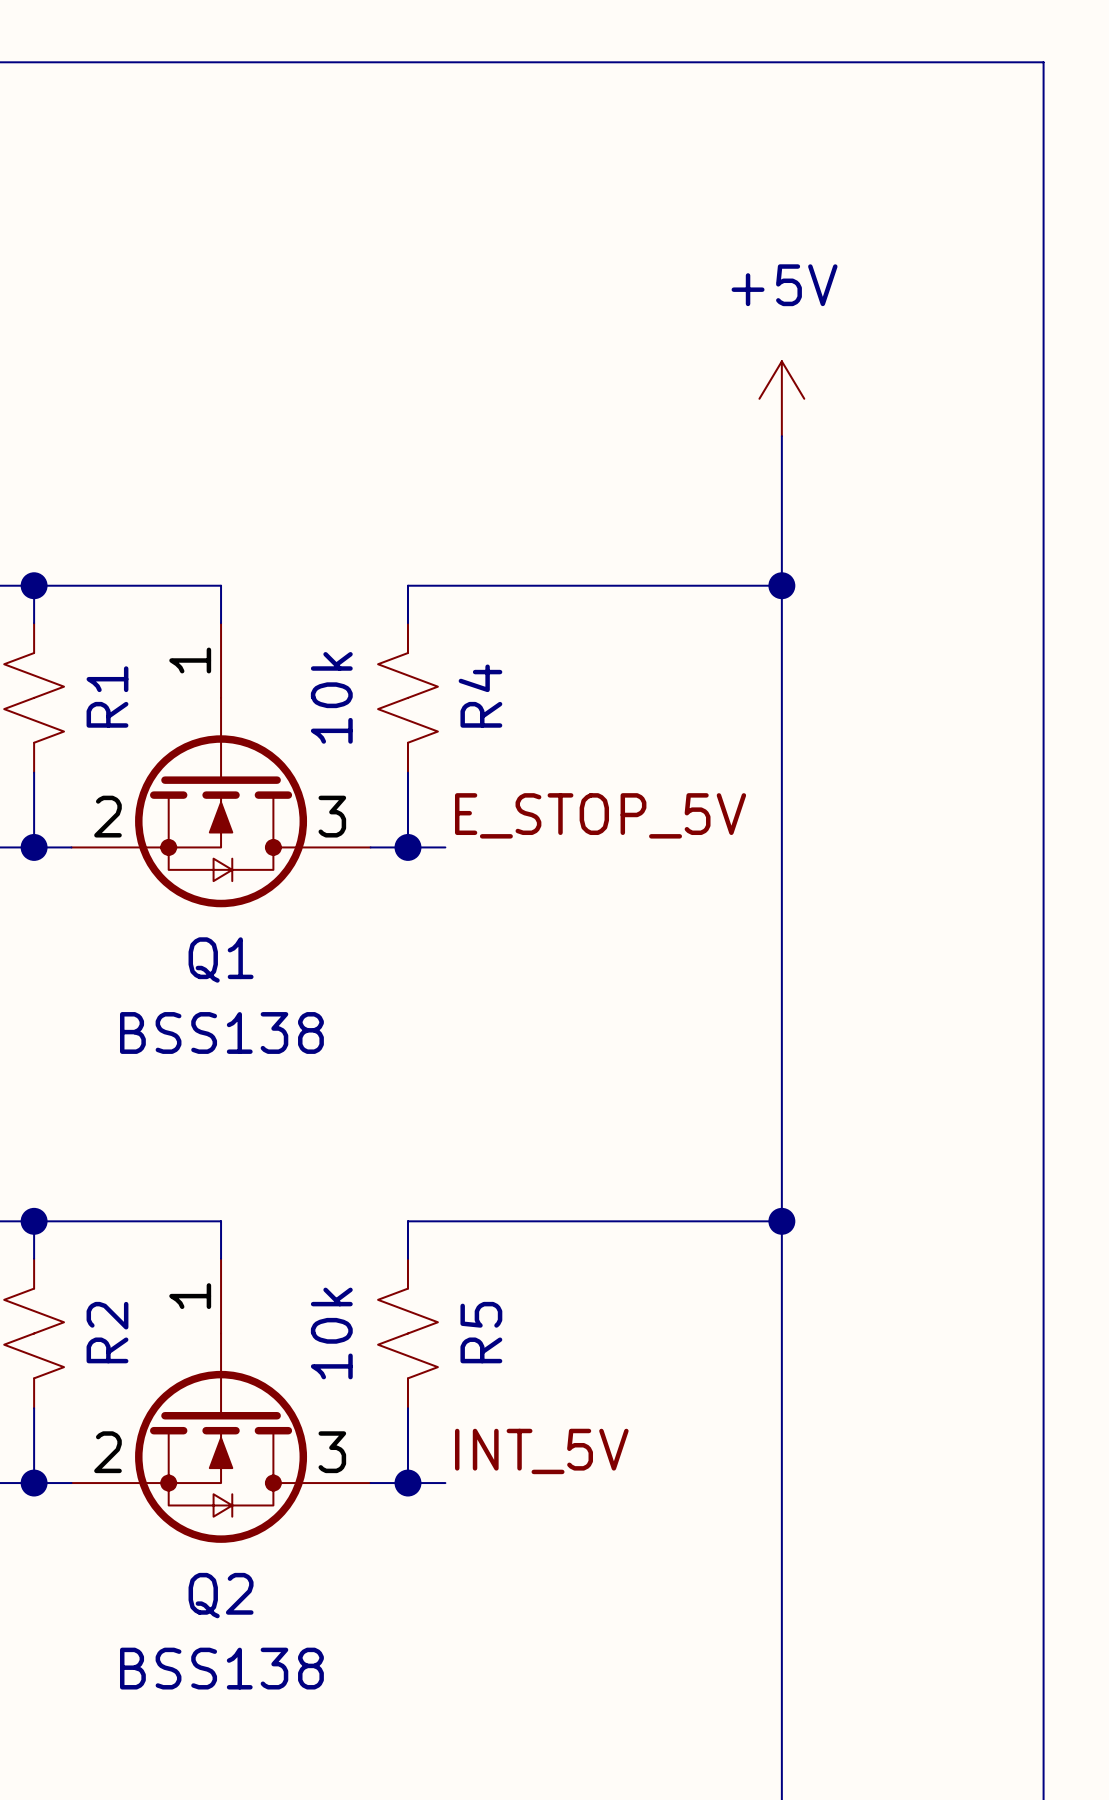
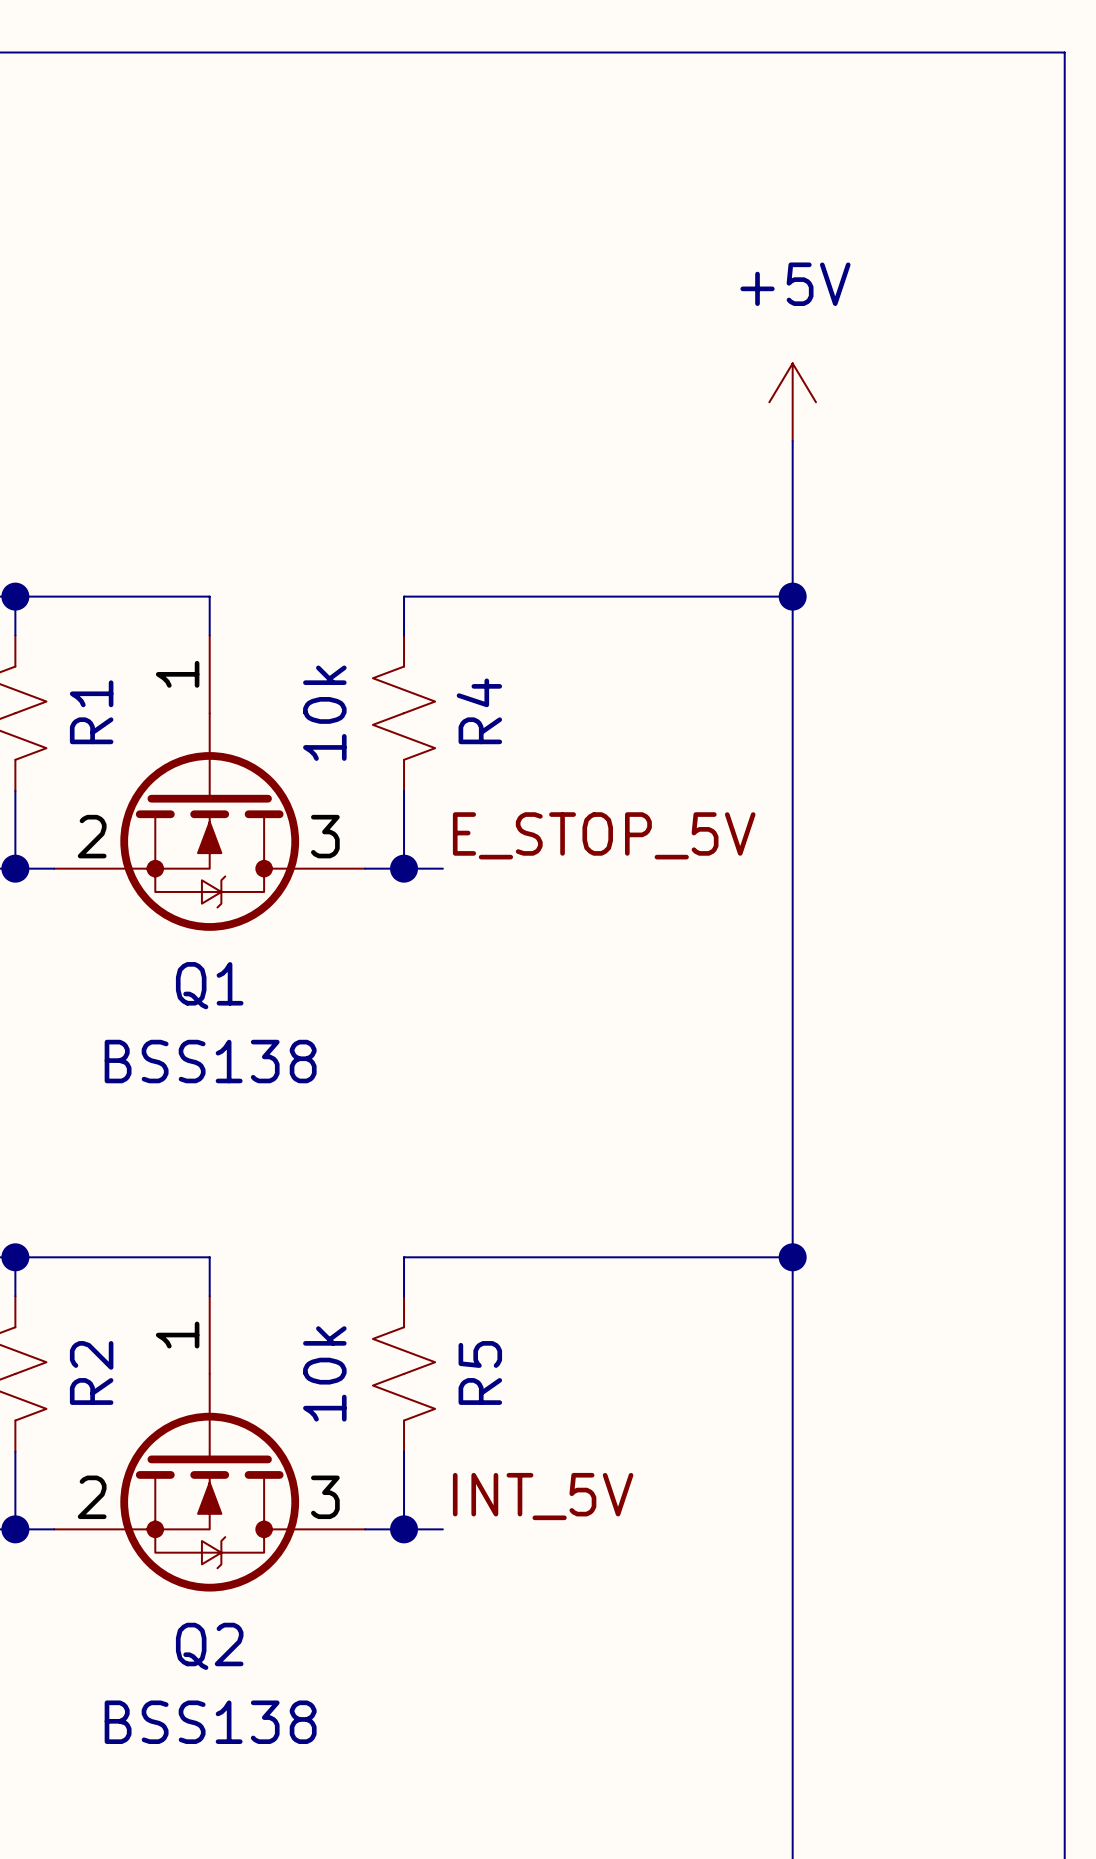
Q1 symbol: [71, 623, 371, 908] -> [54, 635, 366, 931]
Q2 symbol: [71, 1258, 371, 1543] -> [54, 1296, 366, 1592]

